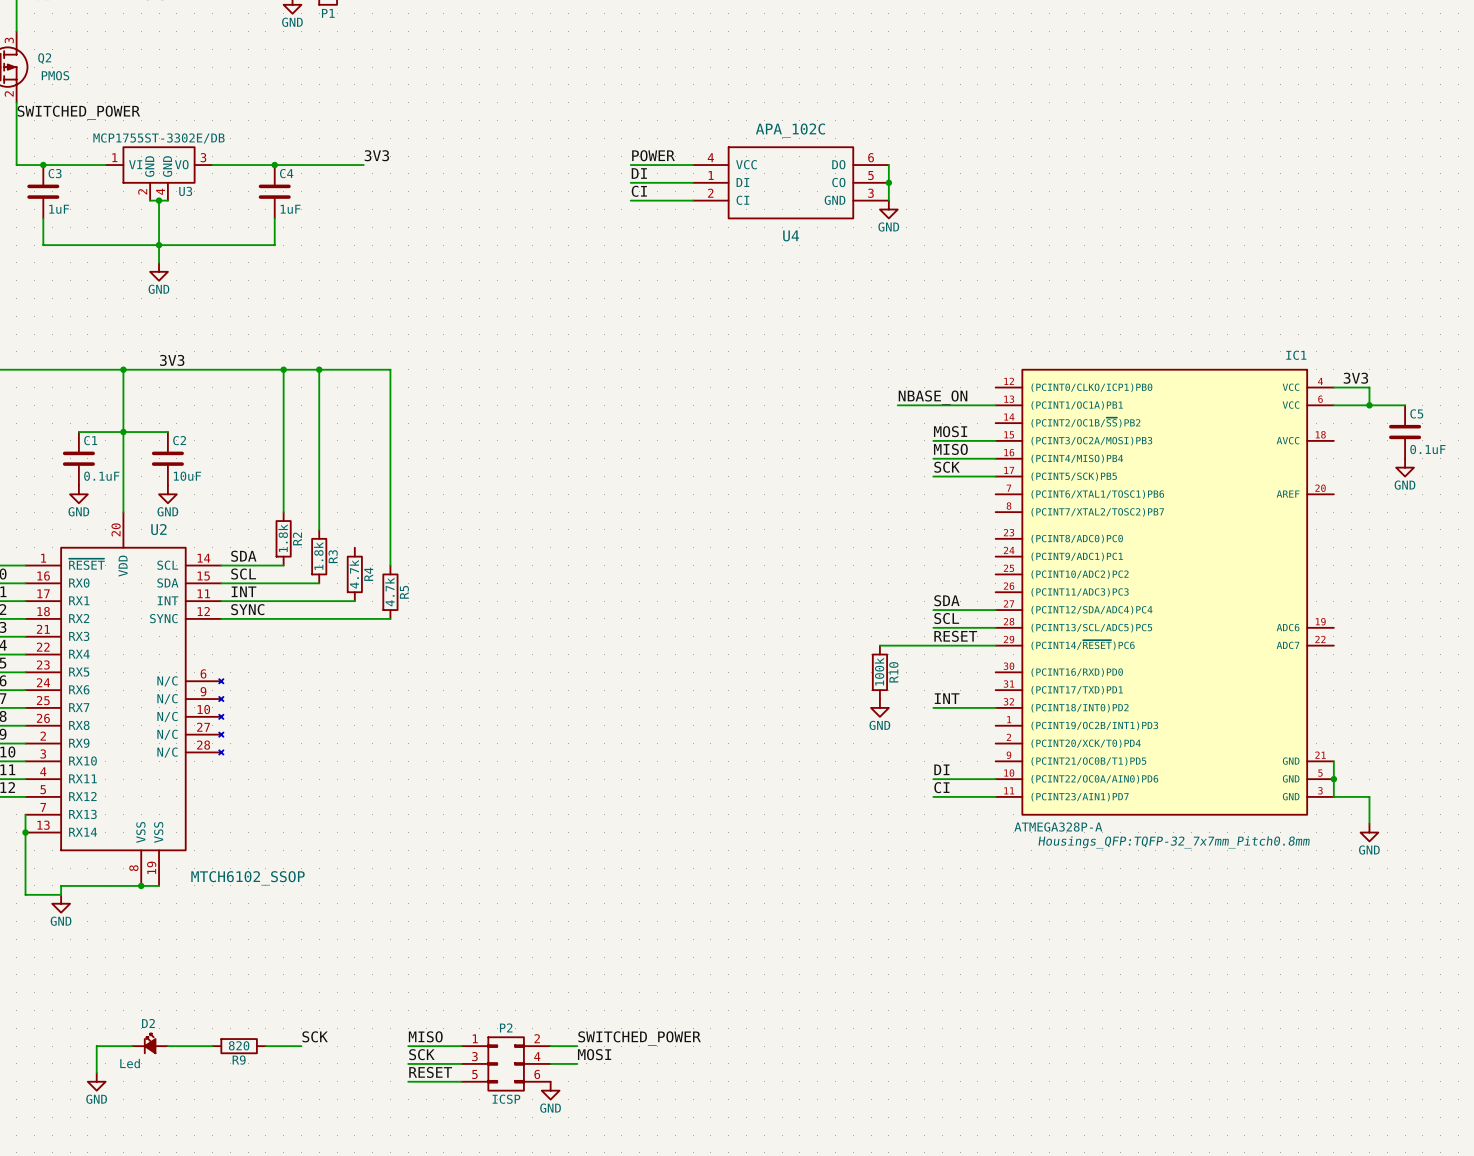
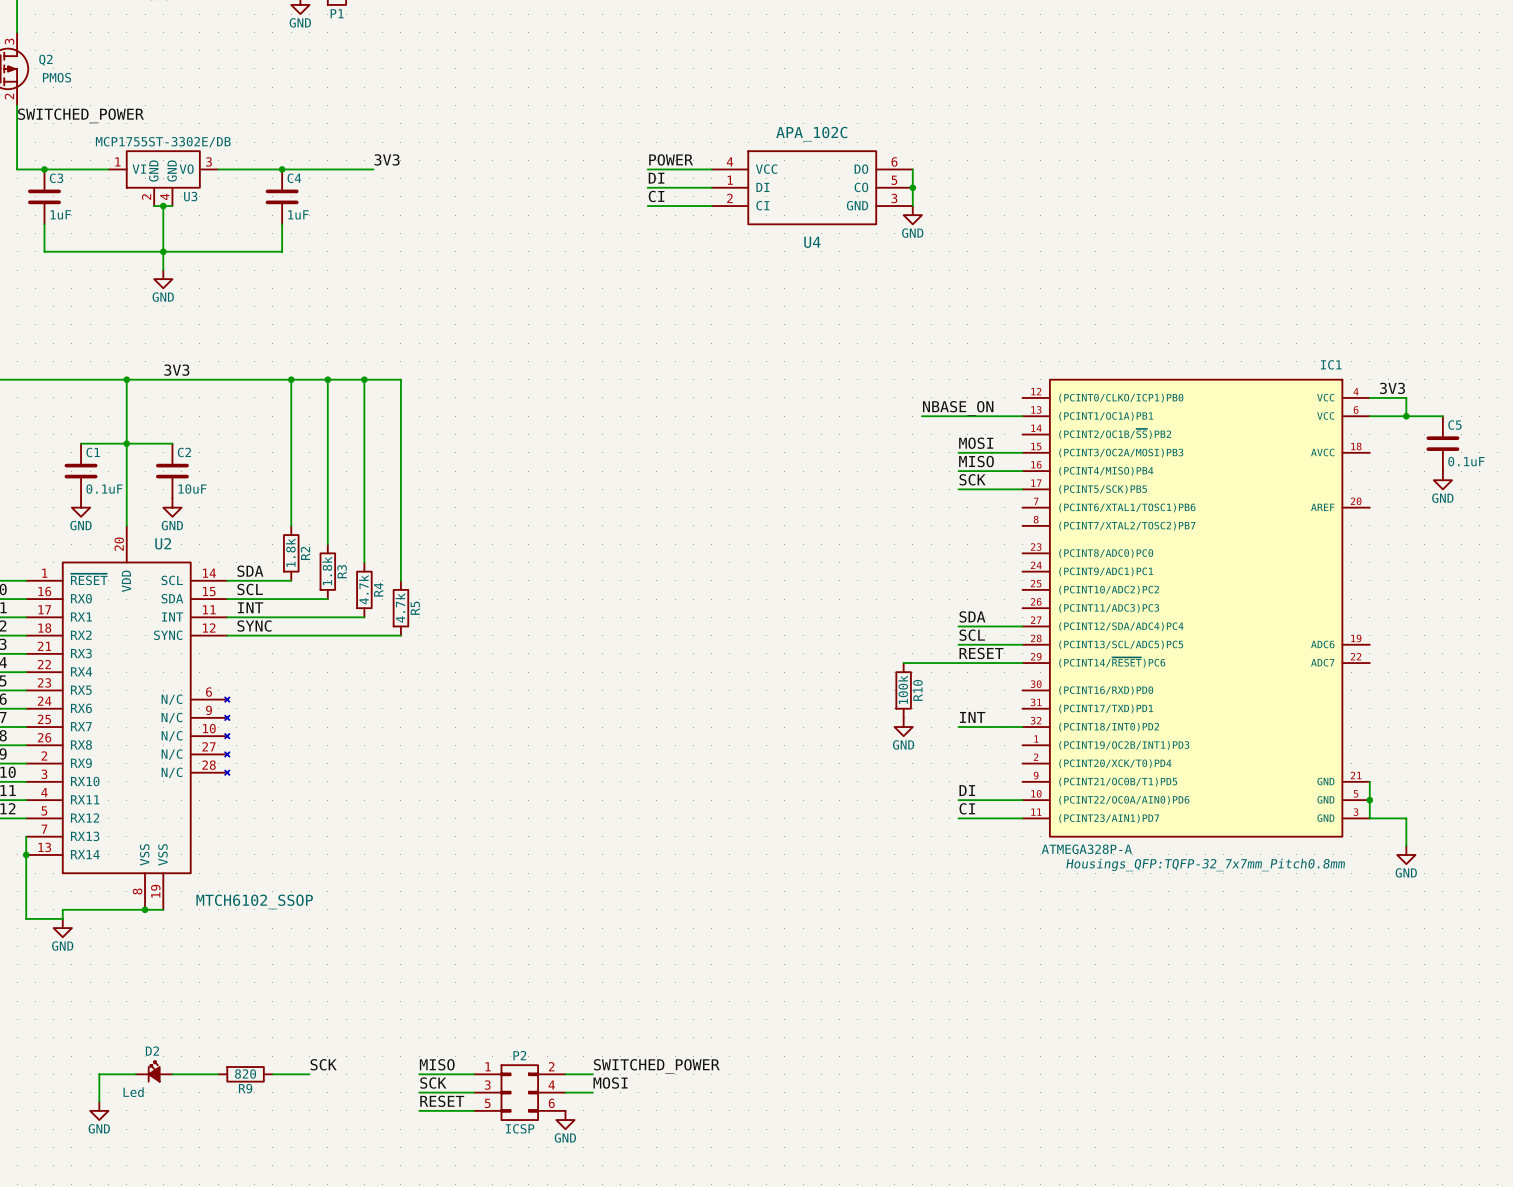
wire: none -> (364, 379) (364, 562)
junction: none -> (364, 379)

